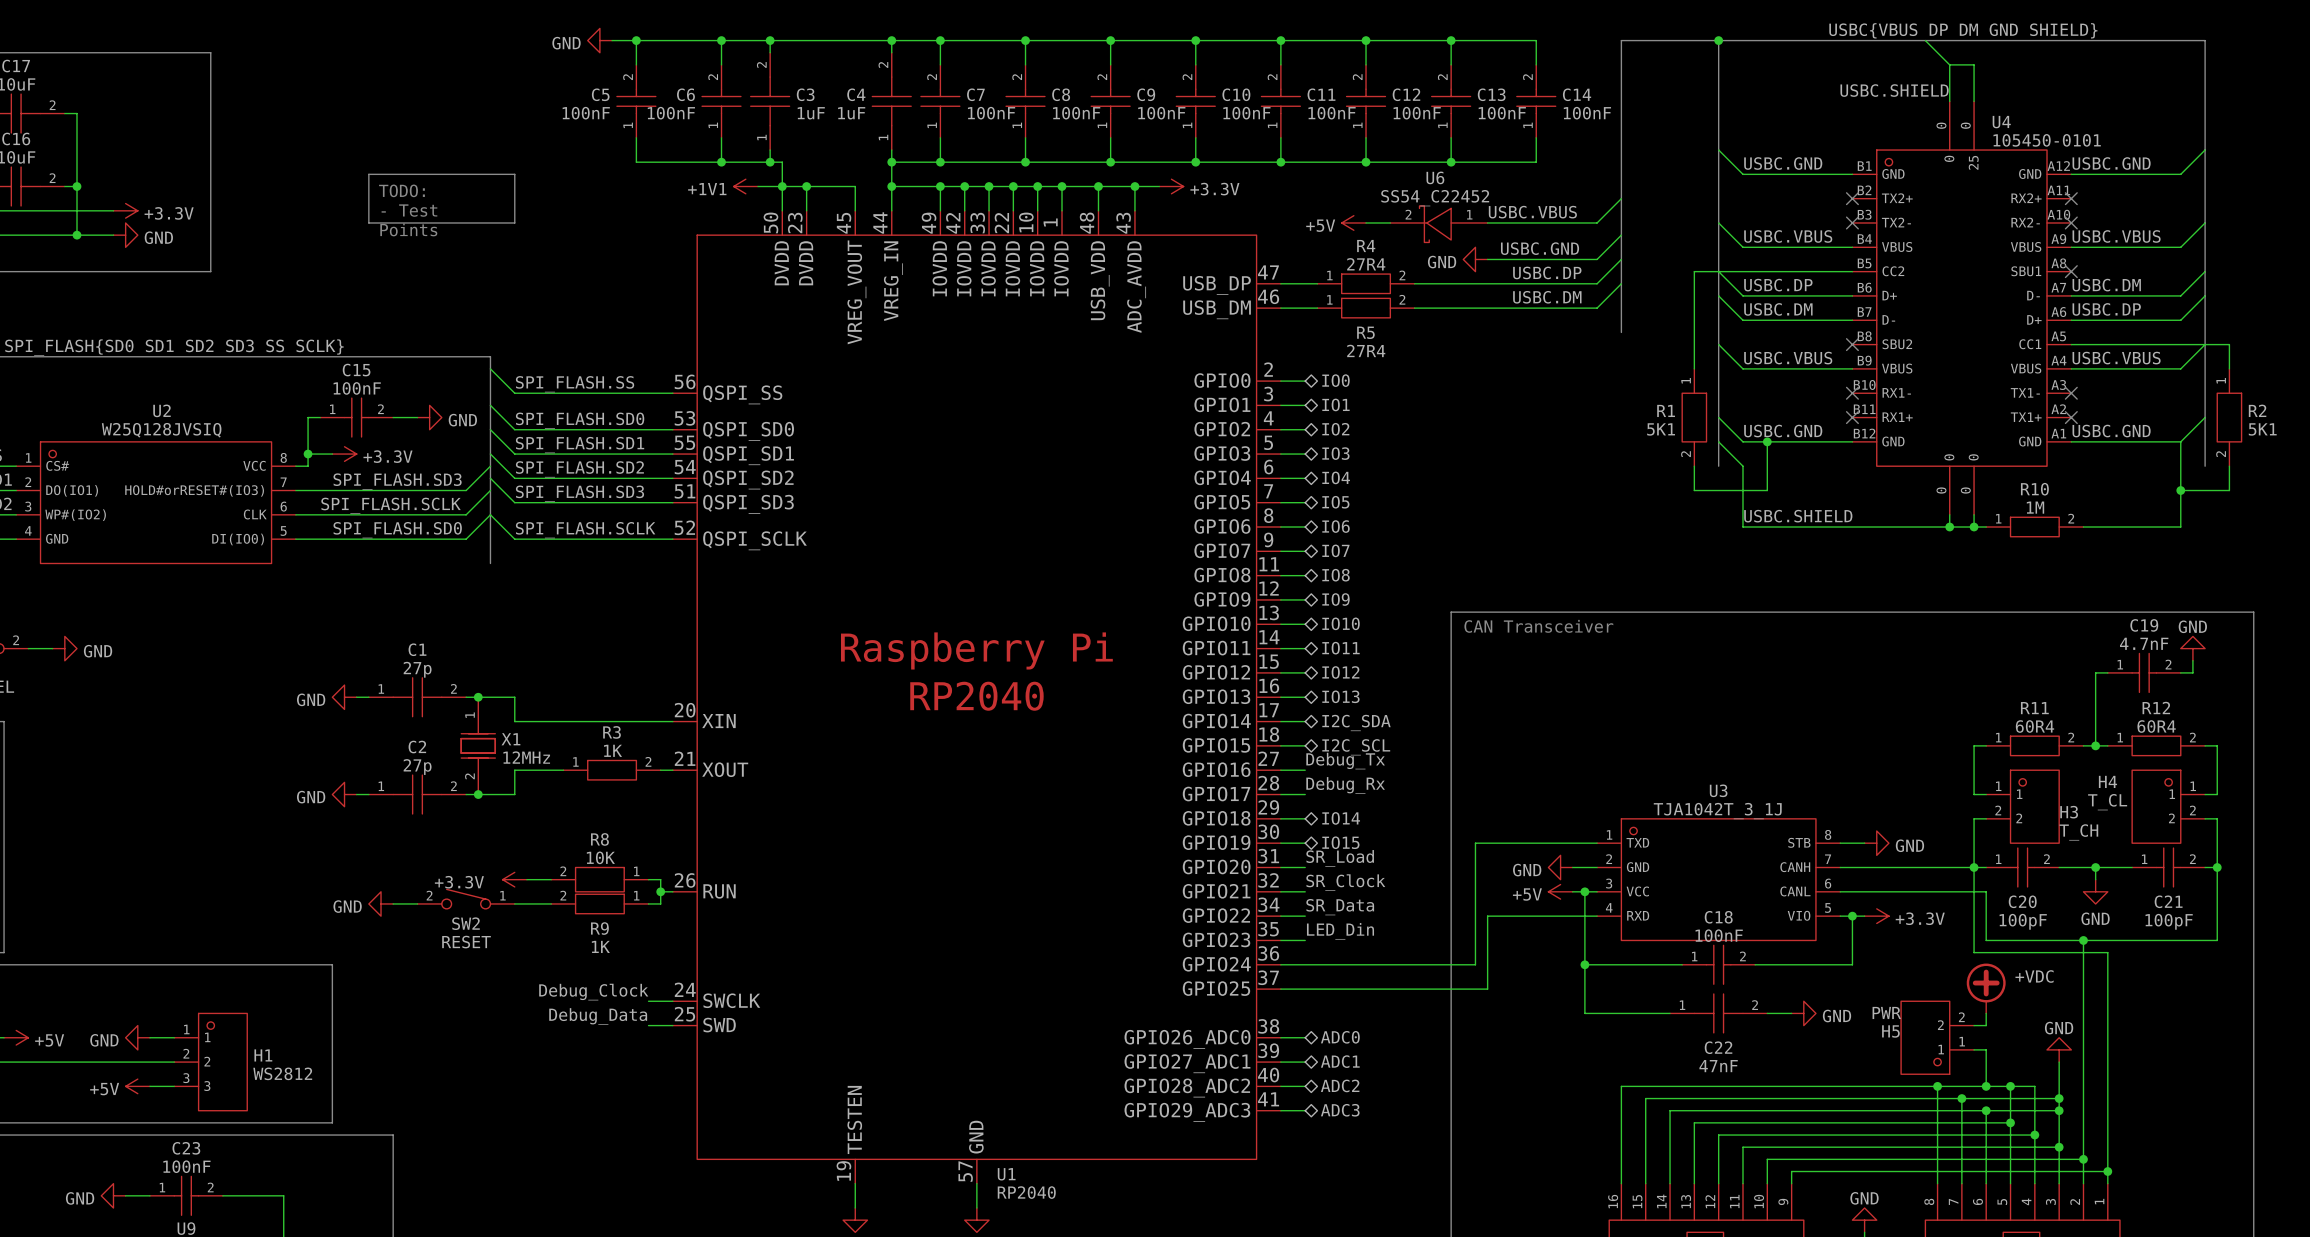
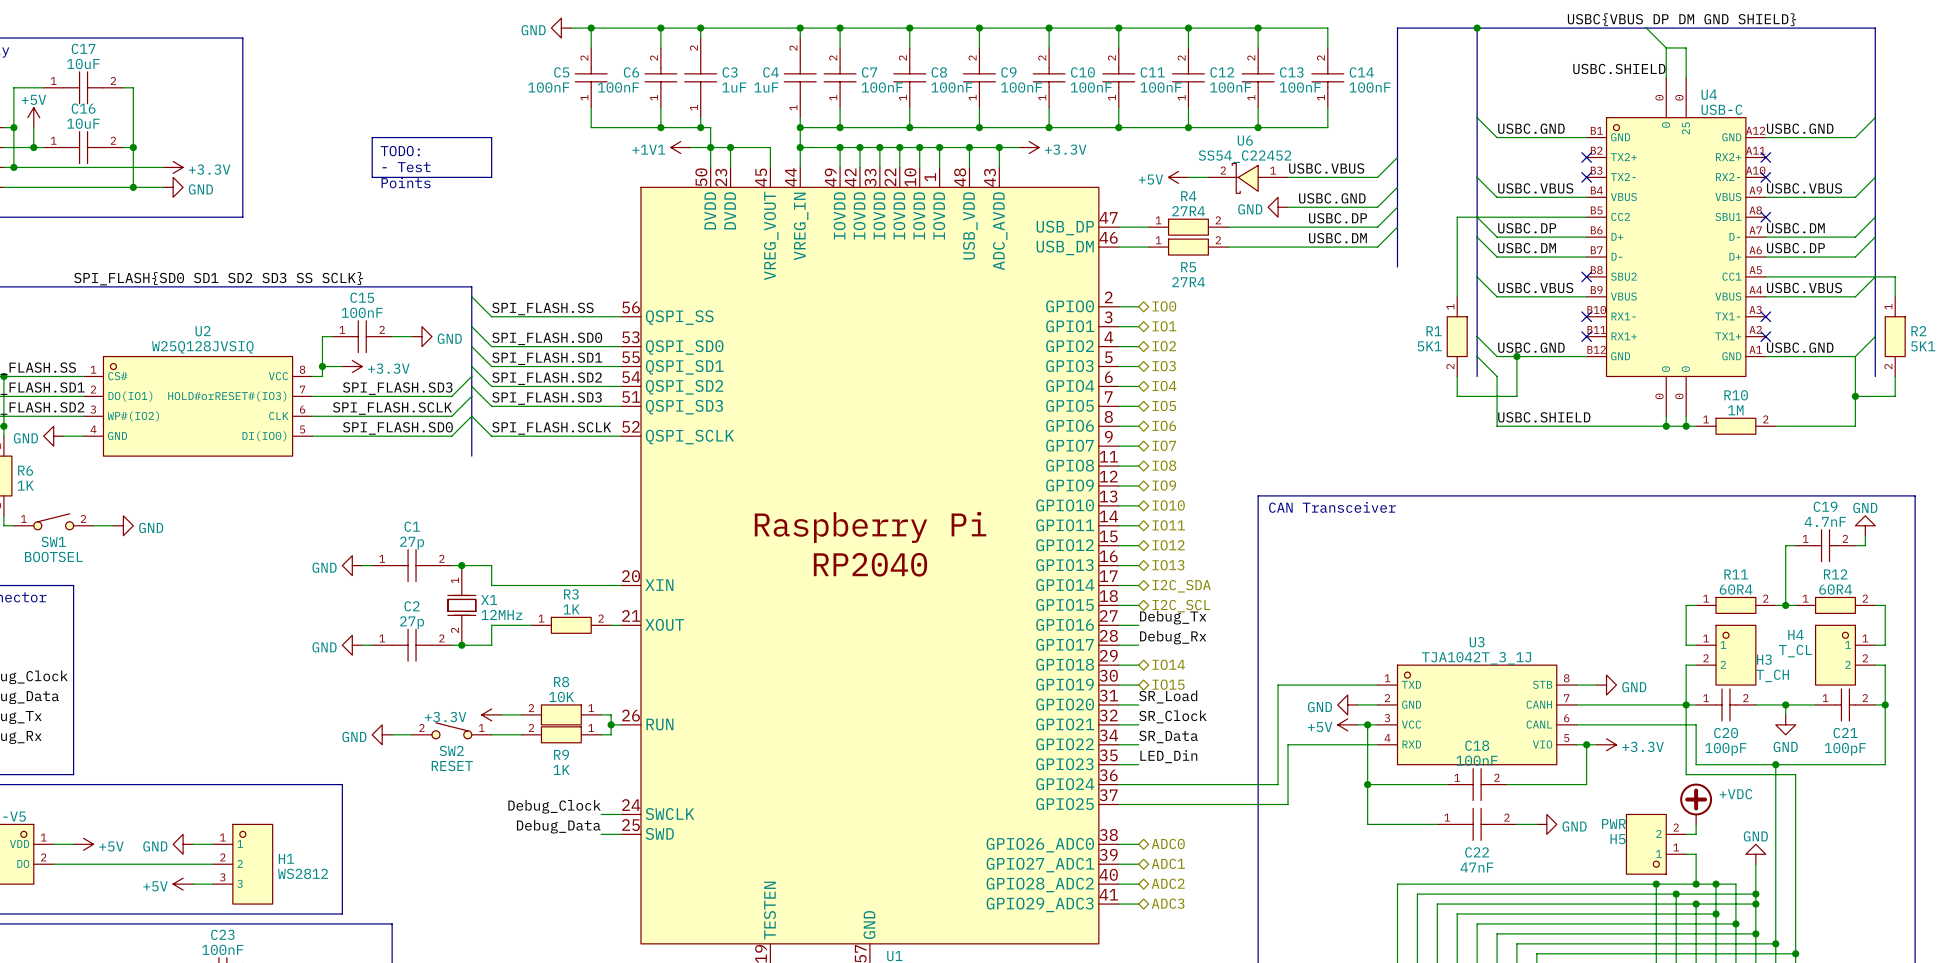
U4 value: 105450-0101 (2047, 140) -> USB-C (1721, 109)

